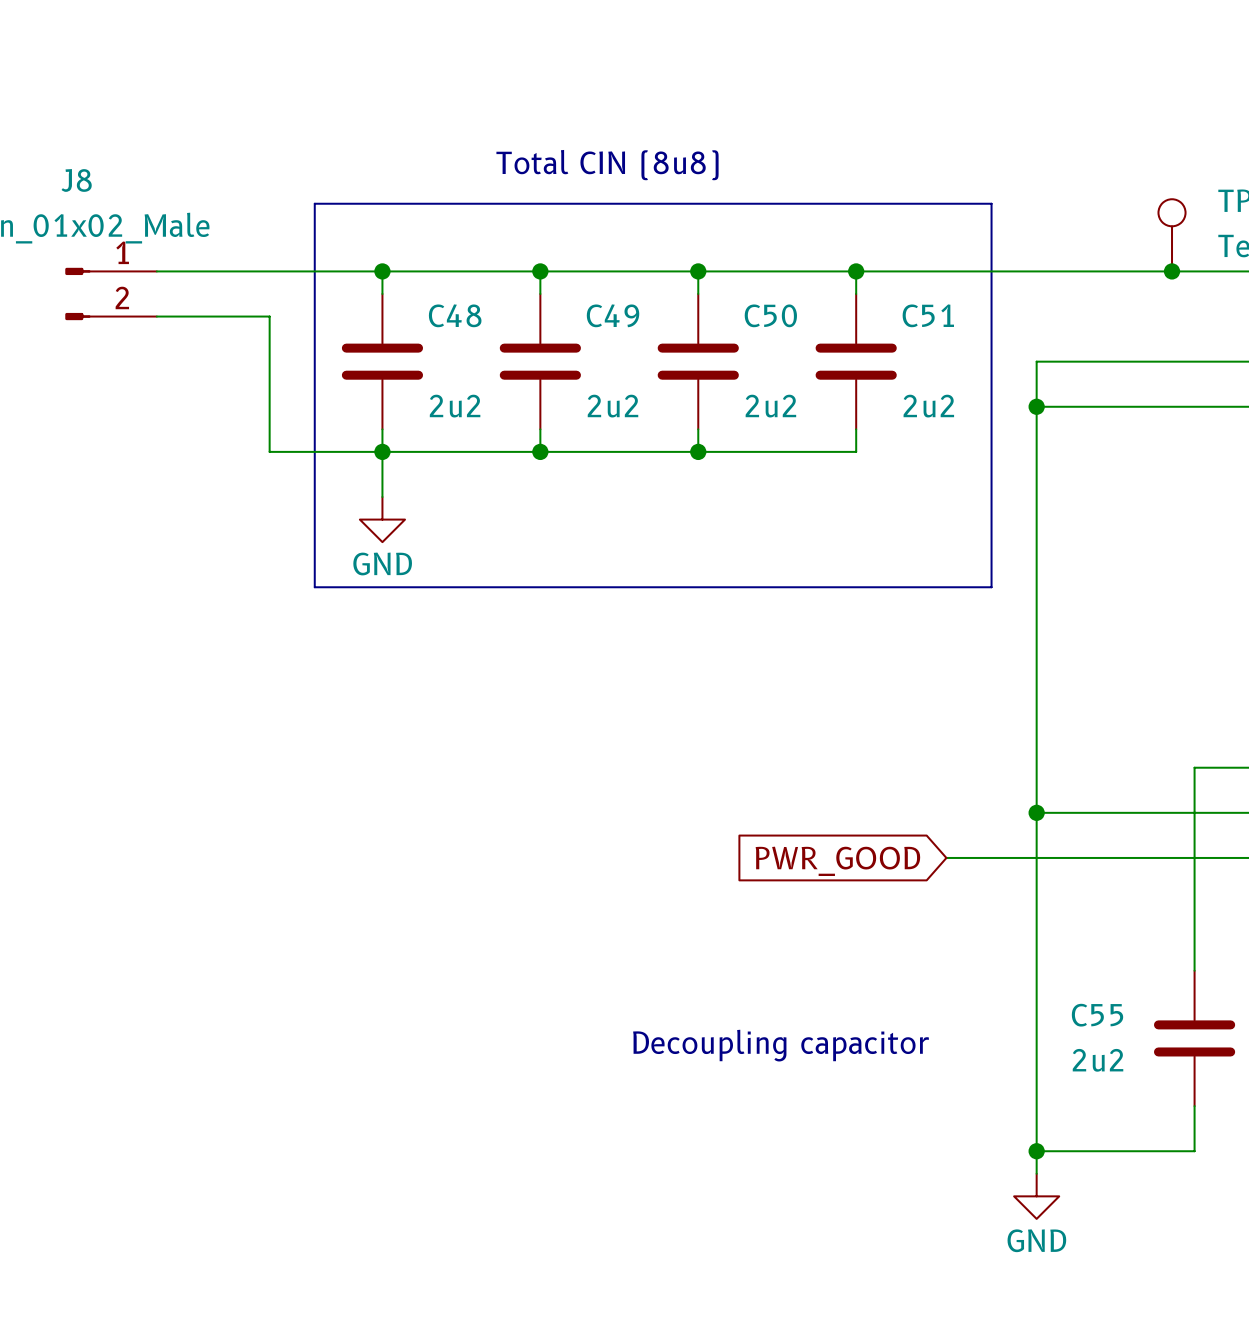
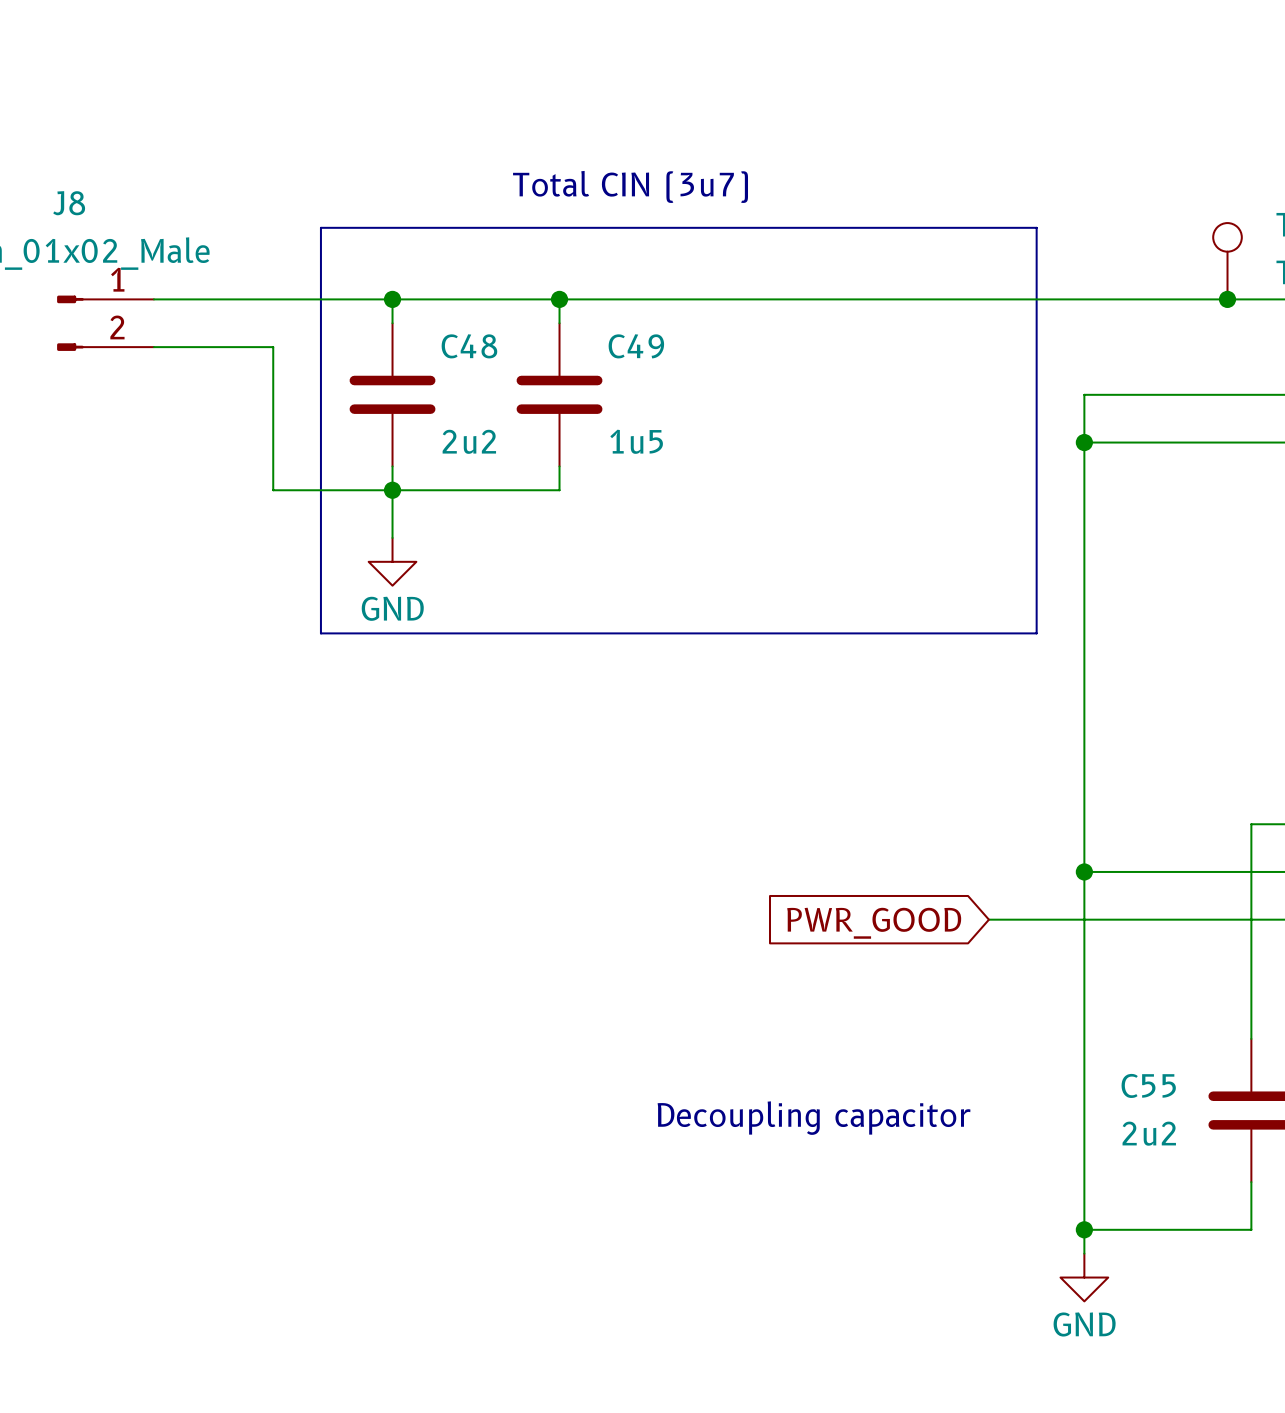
text: Total CIN (8u8) (607, 165) -> Total CIN (3u7) (630, 186)
wire: (698, 271) (698, 293) -> none
junction: (698, 271) -> none
wire: (856, 271) (856, 293) -> none
junction: (856, 271) -> none
C50: 2u2 (698, 361) -> none
C51: 2u2 (856, 361) -> none
C49 value: 2u2 (612, 406) -> 1u5 (636, 441)
wire: (698, 429) (698, 451) -> none
wire: (856, 429) (856, 451) (540, 451) -> none
junction: (540, 451) -> none
junction: (698, 451) -> none

